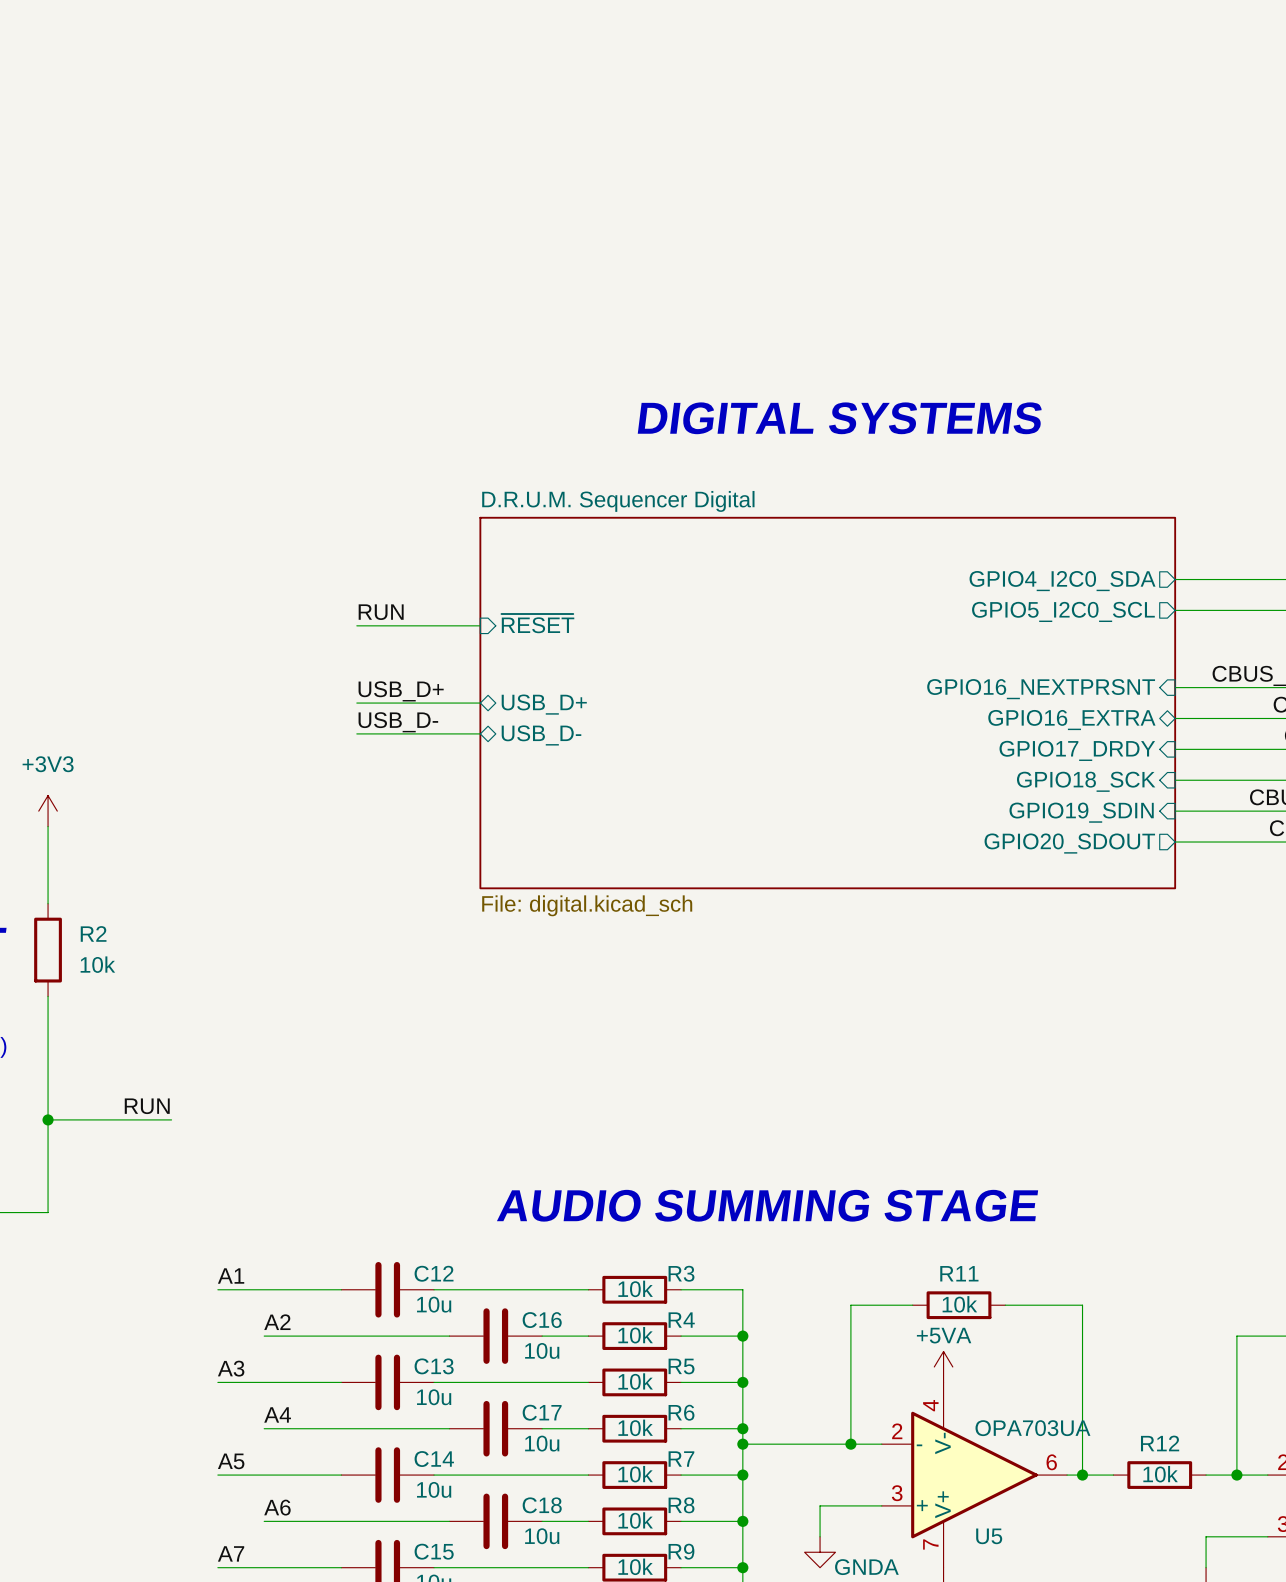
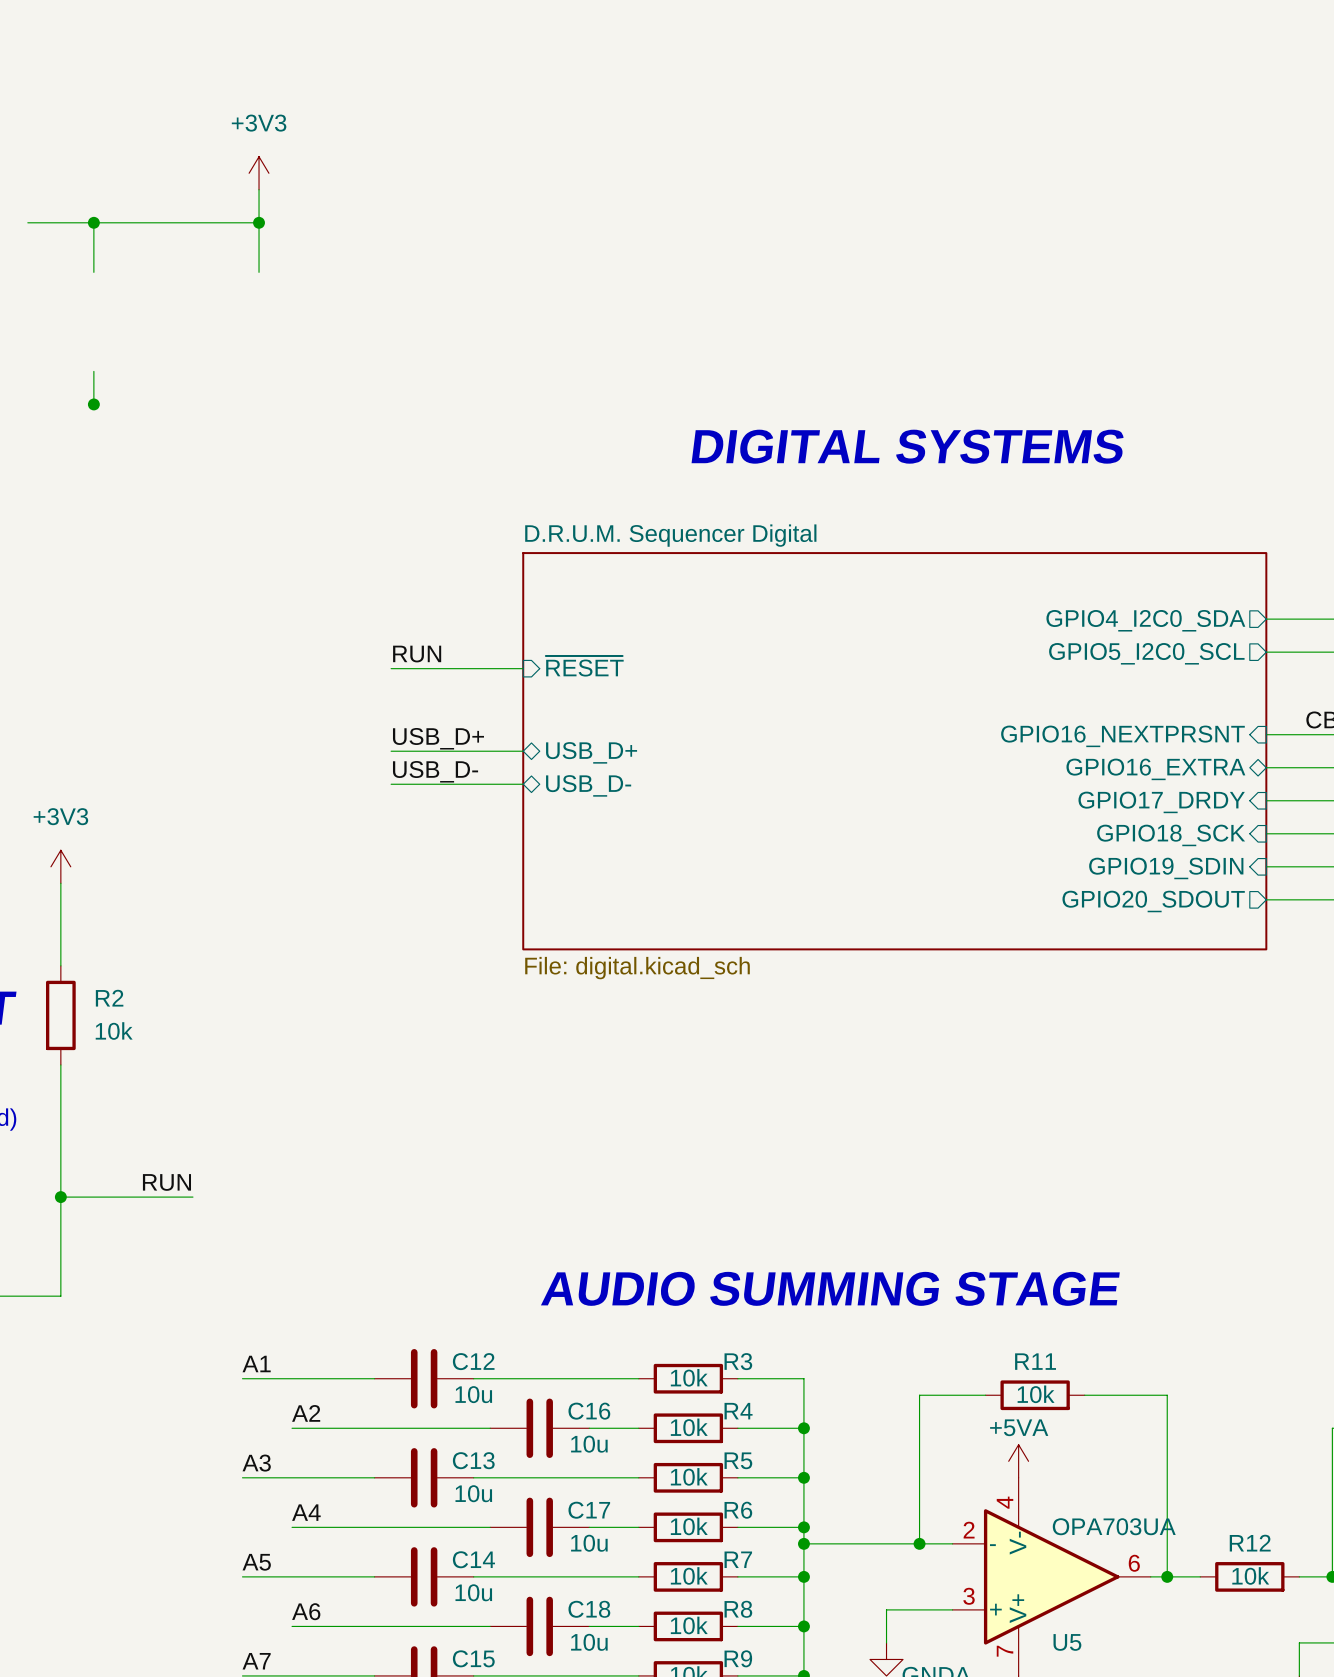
power symbol: none -> +3V3 (259, 173)
wire: none -> (259, 189) (259, 272)
wire: none -> (27, 222) (259, 222)
wire: none -> (93, 222) (93, 272)
junction: none -> (93, 222)
junction: none -> (259, 222)
wire: none -> (93, 371) (93, 404)
junction: none -> (93, 404)

